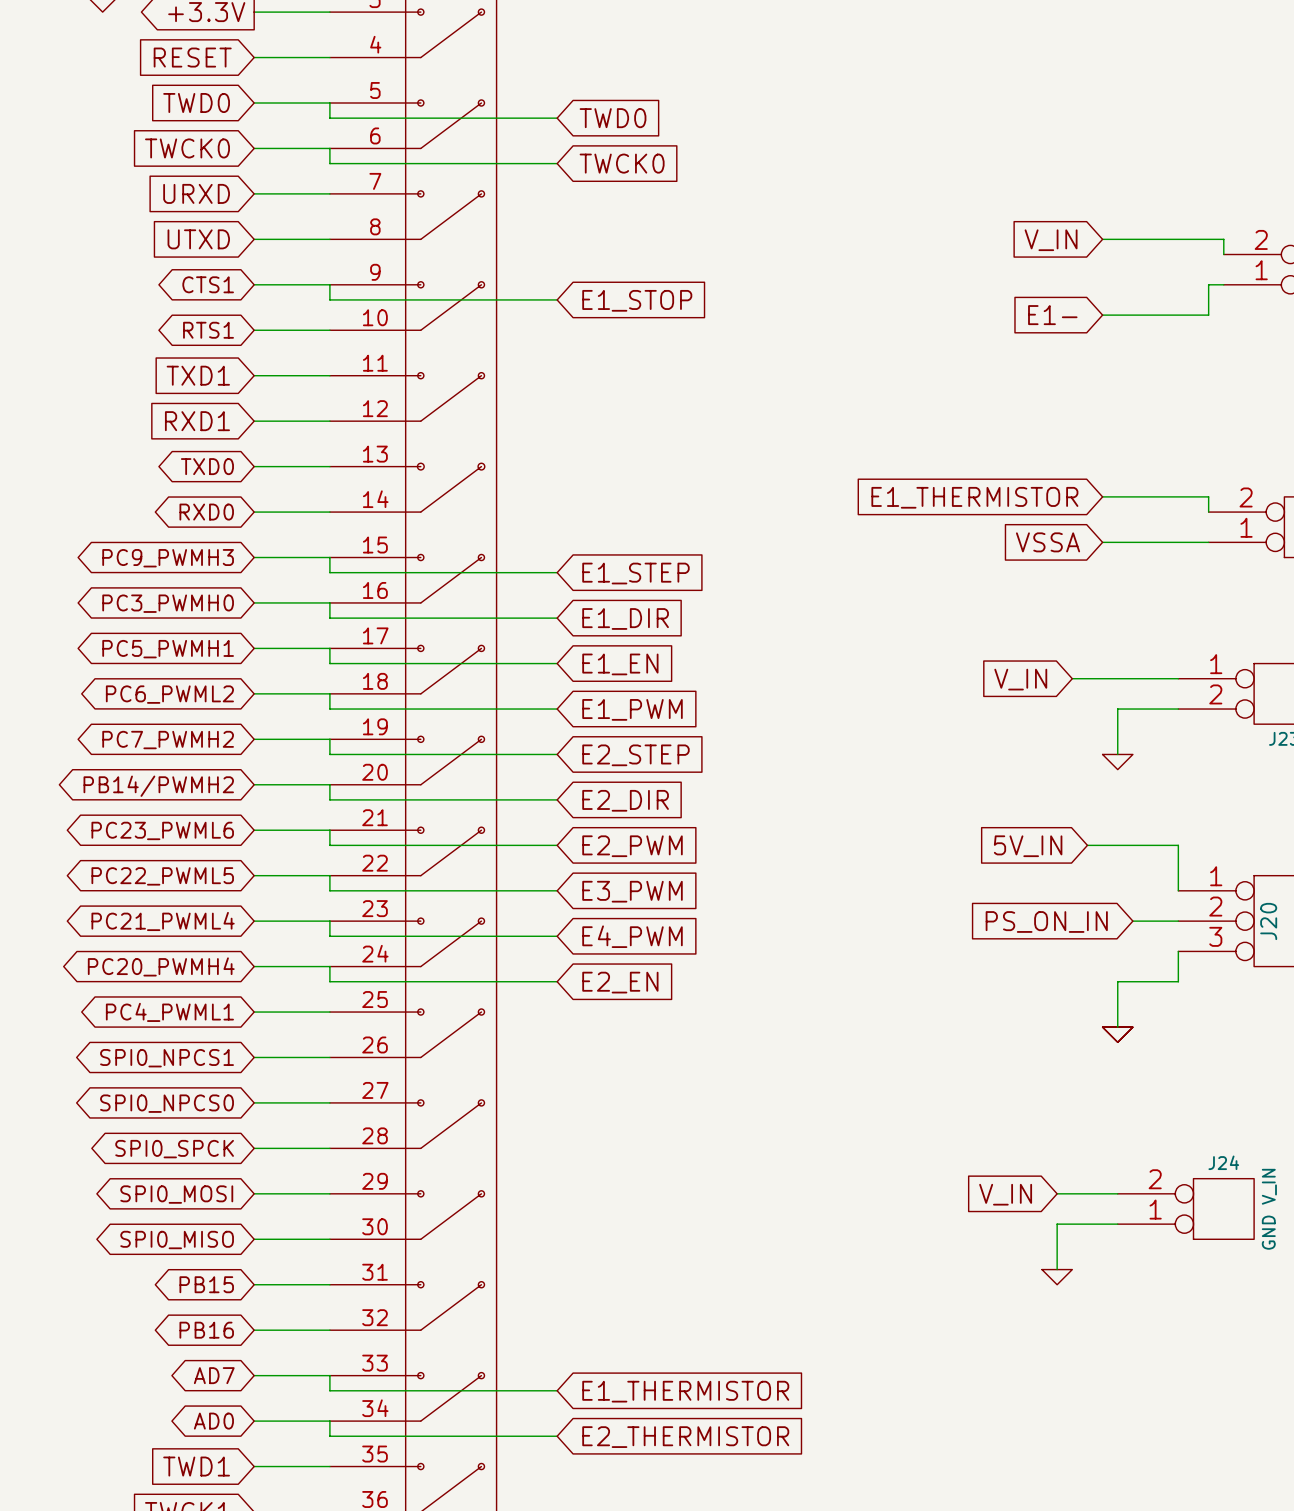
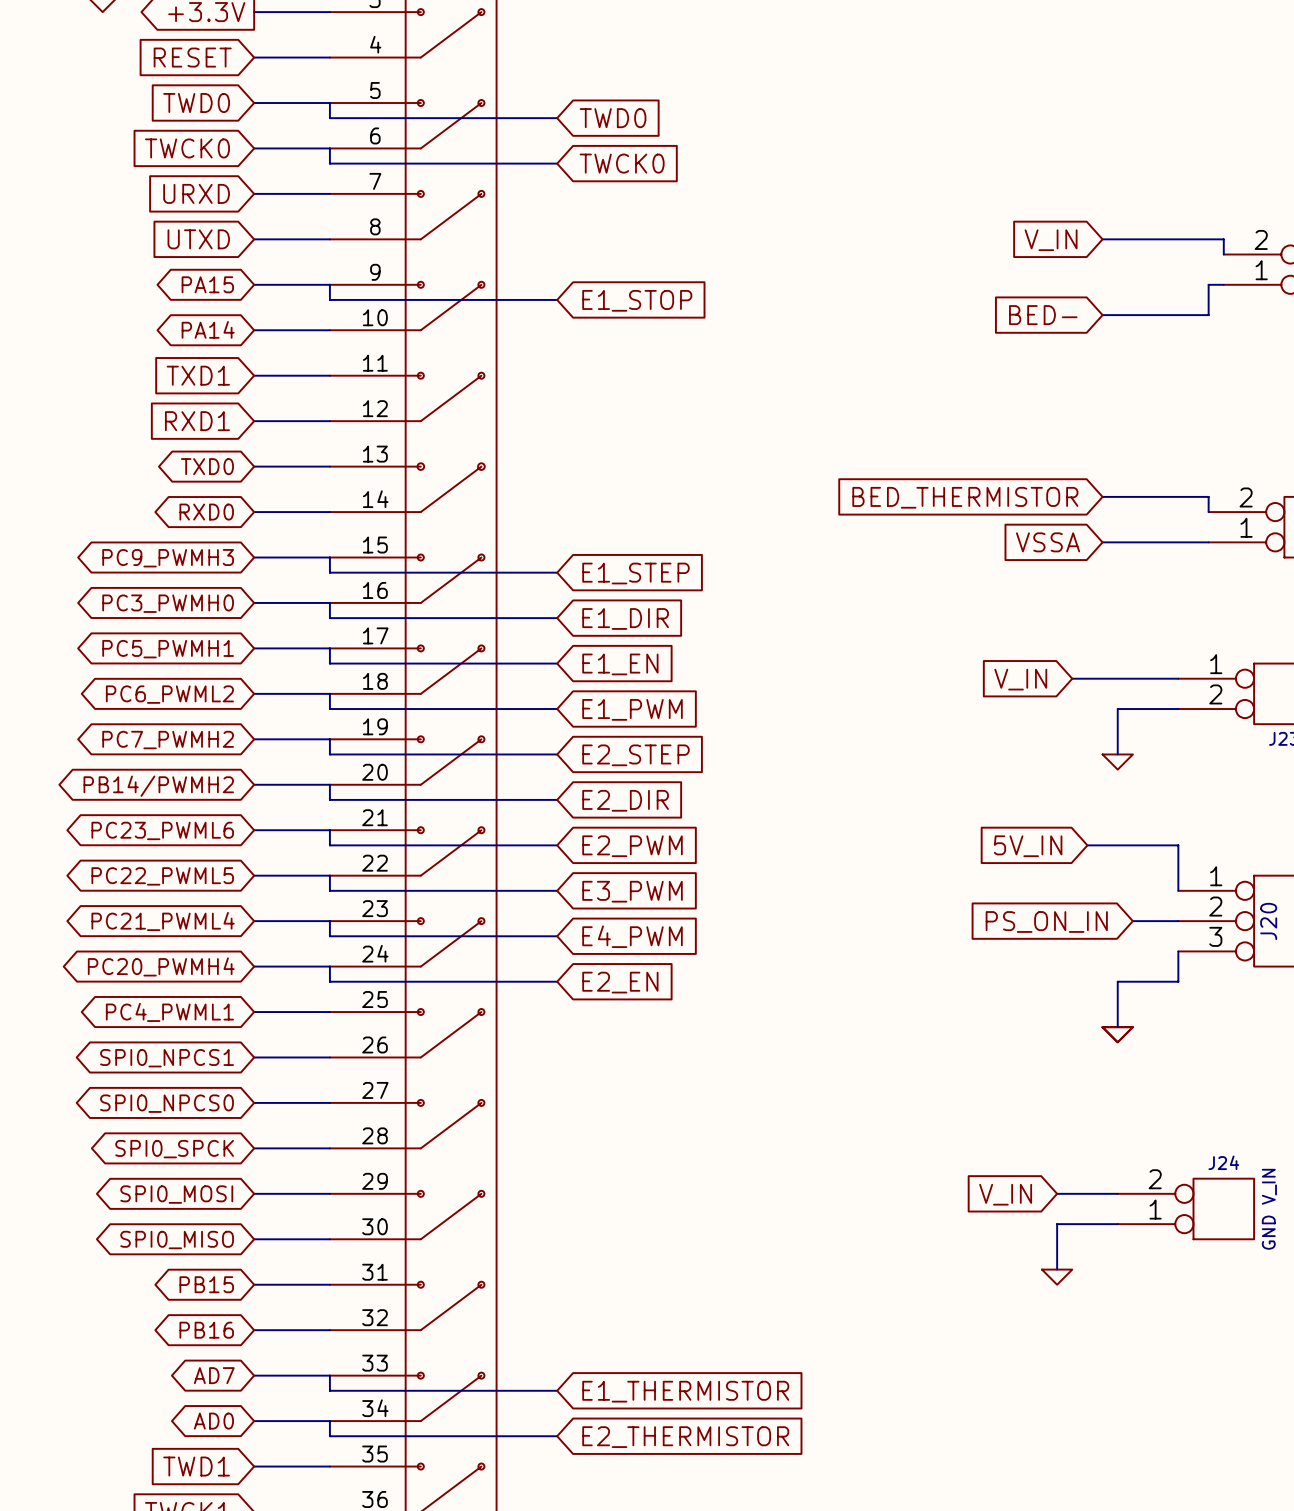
global label: CTS1 (208, 284) -> PA15 (207, 284)
global label: E1- (1052, 315) -> BED- (1043, 315)
global label: RTS1 (208, 330) -> PA14 (208, 329)
global label: E1_THERMISTOR (974, 497) -> BED_THERMISTOR (965, 497)

